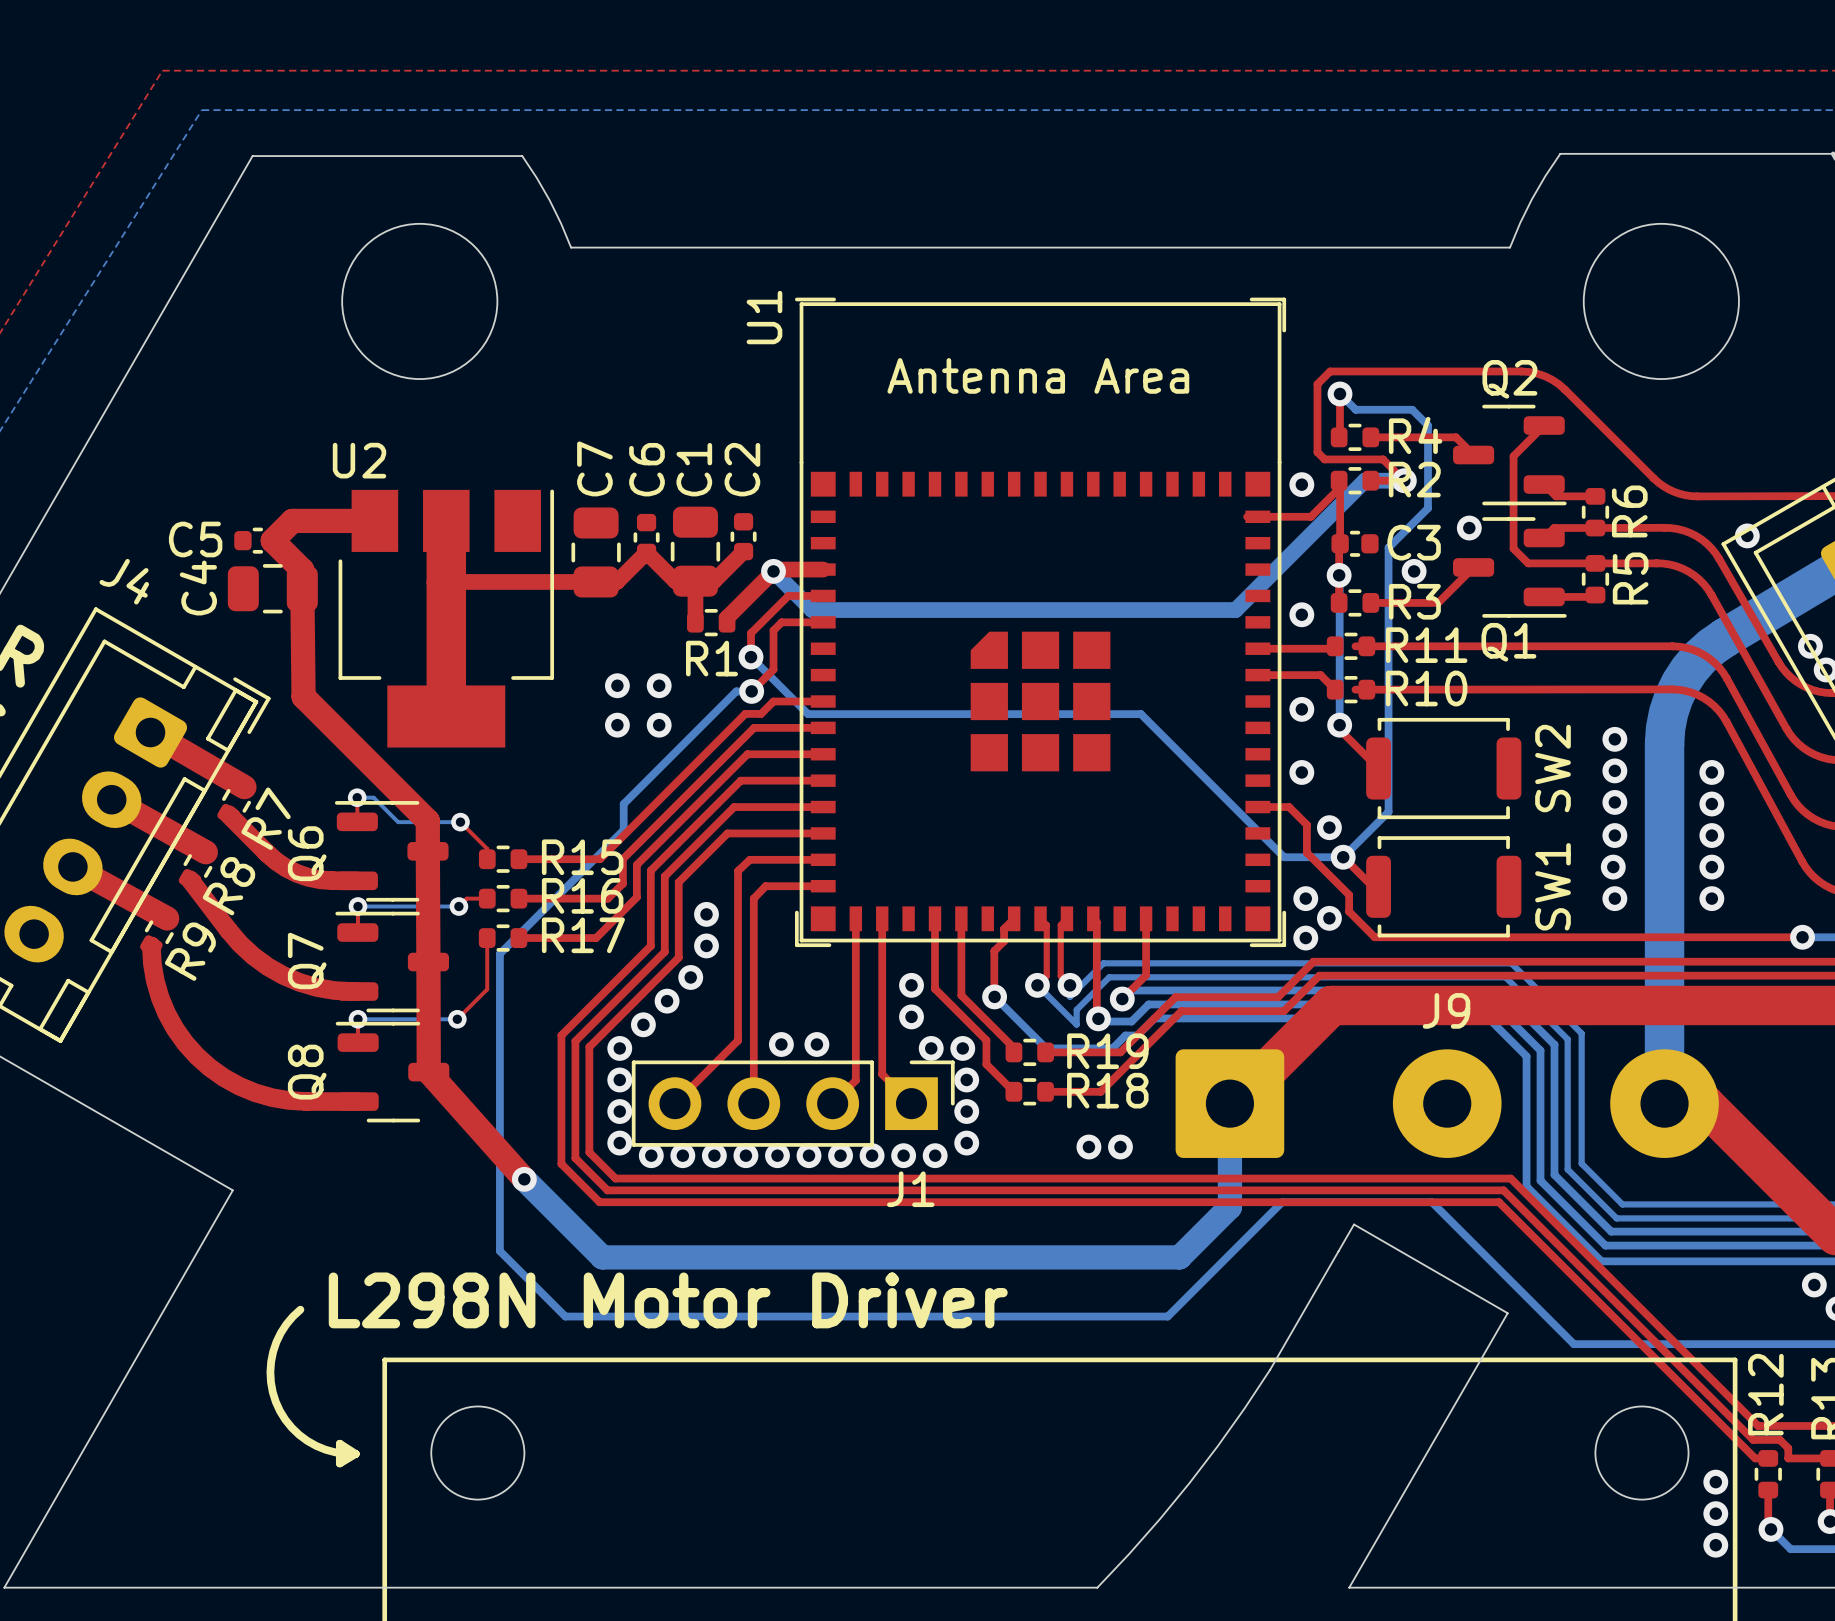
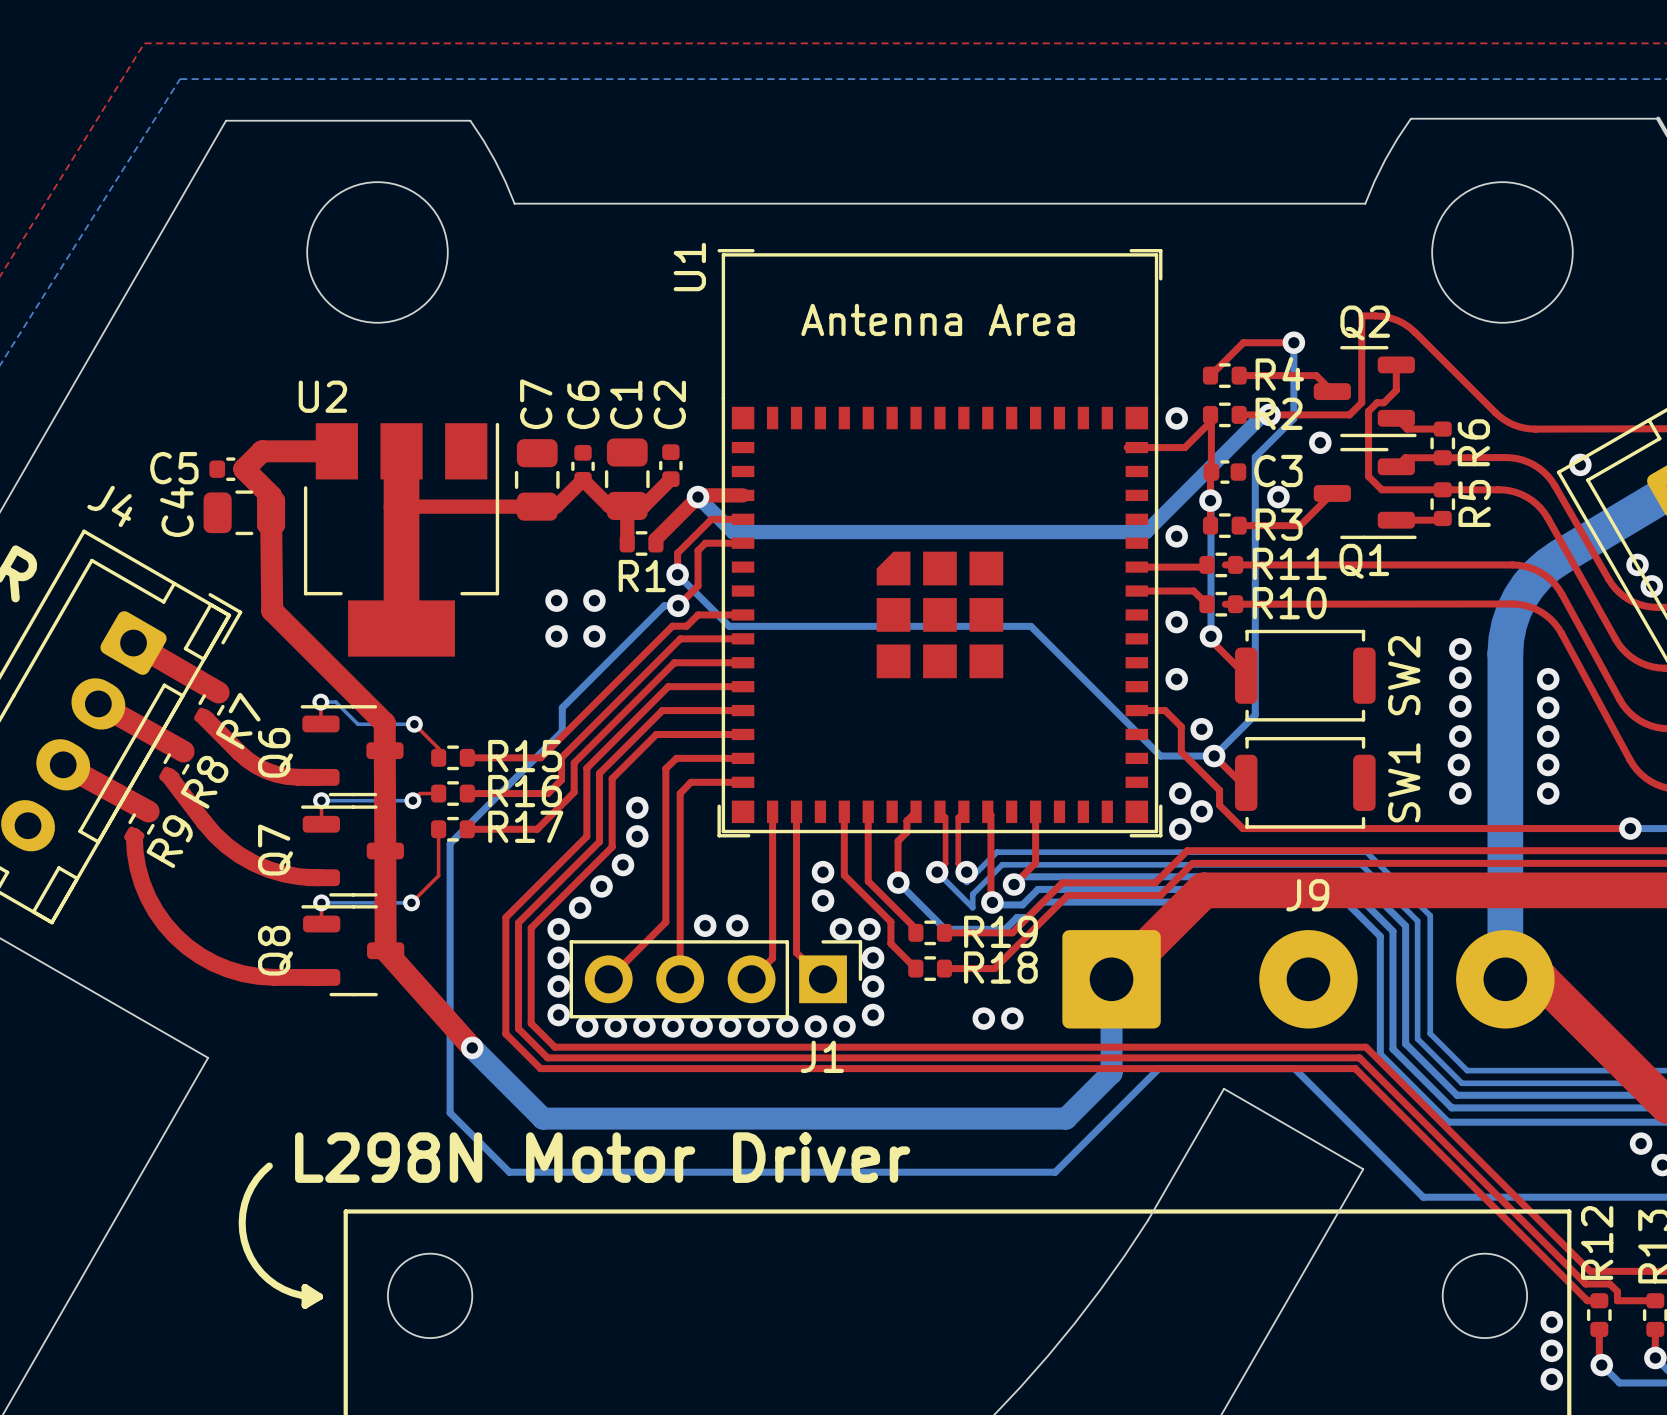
top track: (1506, 371) (1330, 371) (1317, 384) (1317, 452) (1324, 459) (1383, 459) (1404, 480) -> (1361, 315) (1361, 402) (1349, 414) (1269, 414)
top track: (1339, 393) (1339, 436) -> (1293, 342) (1243, 342) (1211, 374)
bottom track: (1339, 393) (1355, 409) (1412, 409) (1427, 425) (1427, 508) (1388, 547) -> (1293, 342) (1293, 418) (1255, 457) (1255, 475)
via: (1339, 393) -> none
via: none -> (1293, 342)
top track: (1544, 425) (1513, 456) (1513, 476) -> (1396, 364) (1396, 390) (1383, 402) (1377, 402) (1368, 411)
bottom track: (1397, 480) (1364, 480) (1235, 610) -> (1263, 414) (1145, 532) (1116, 532)
via position: (1469, 528) -> (1320, 442)

